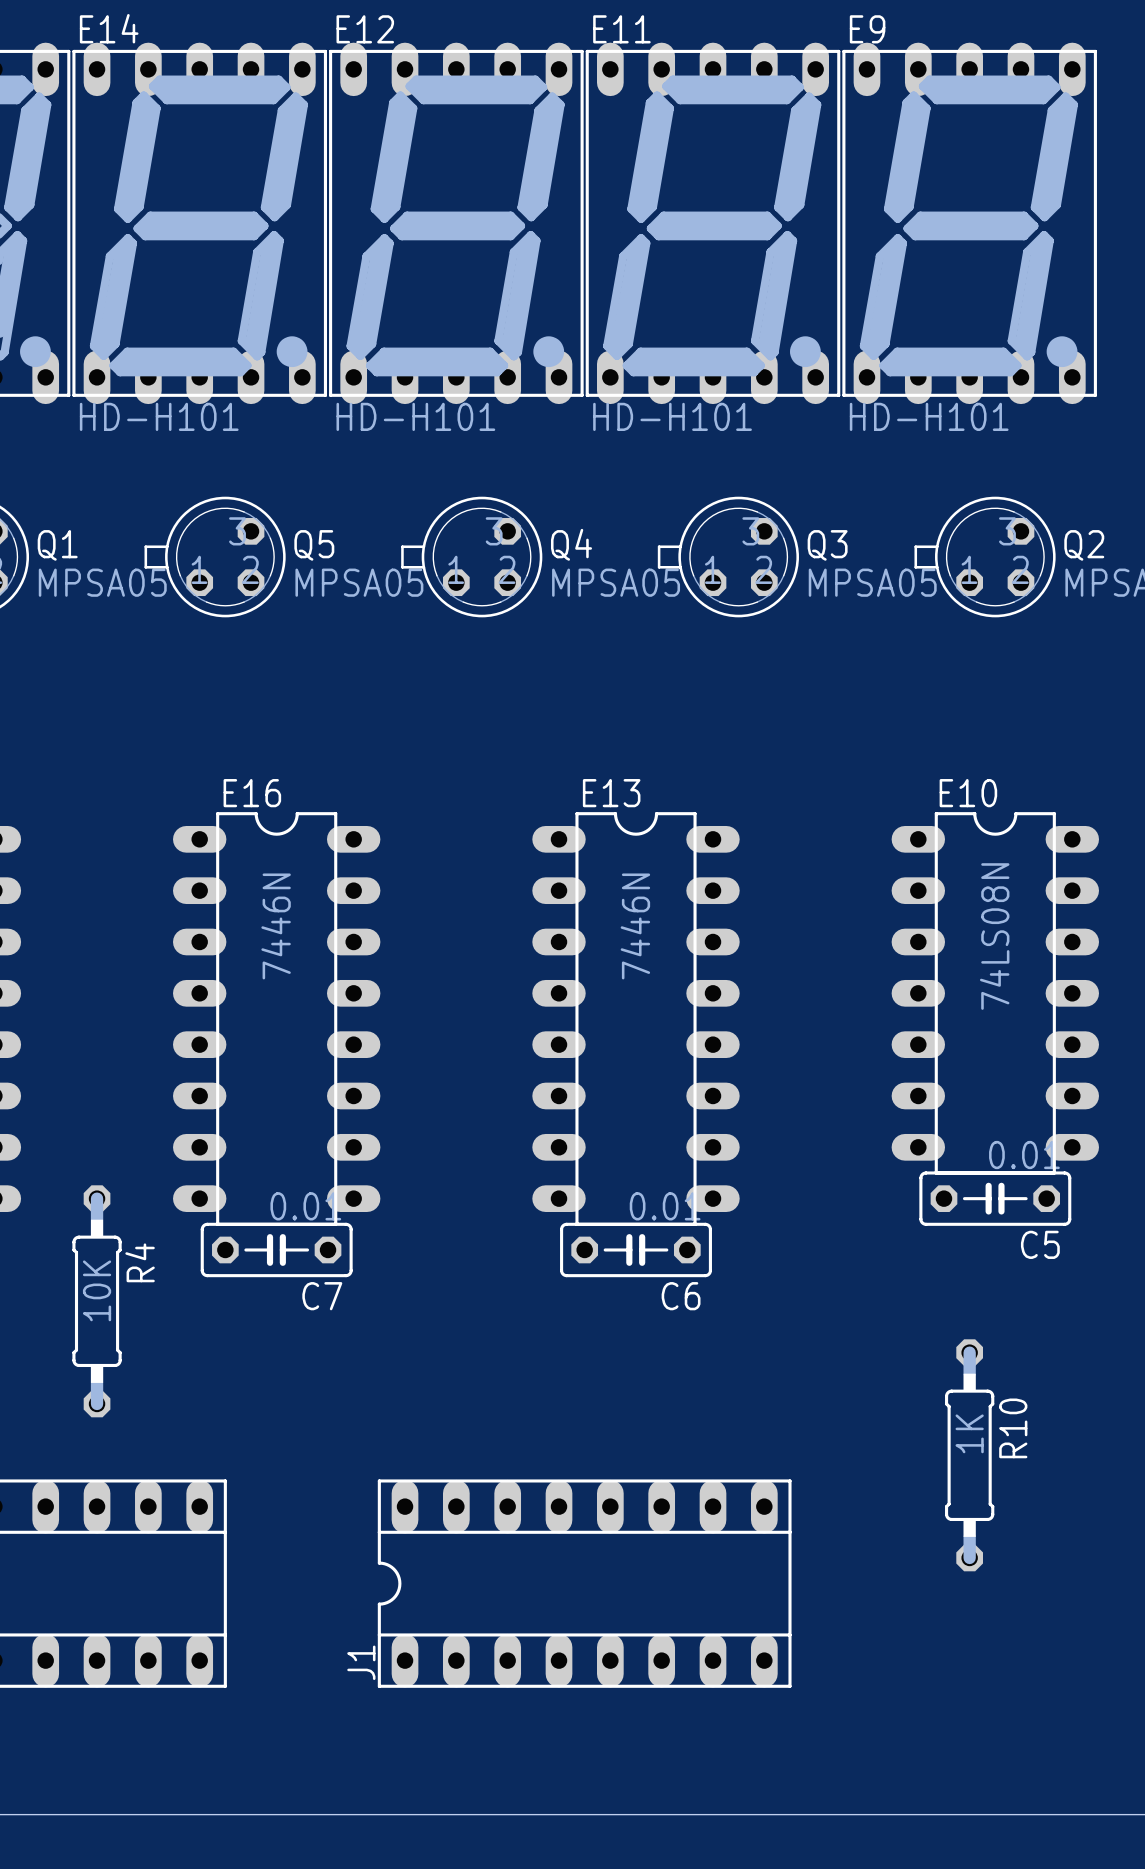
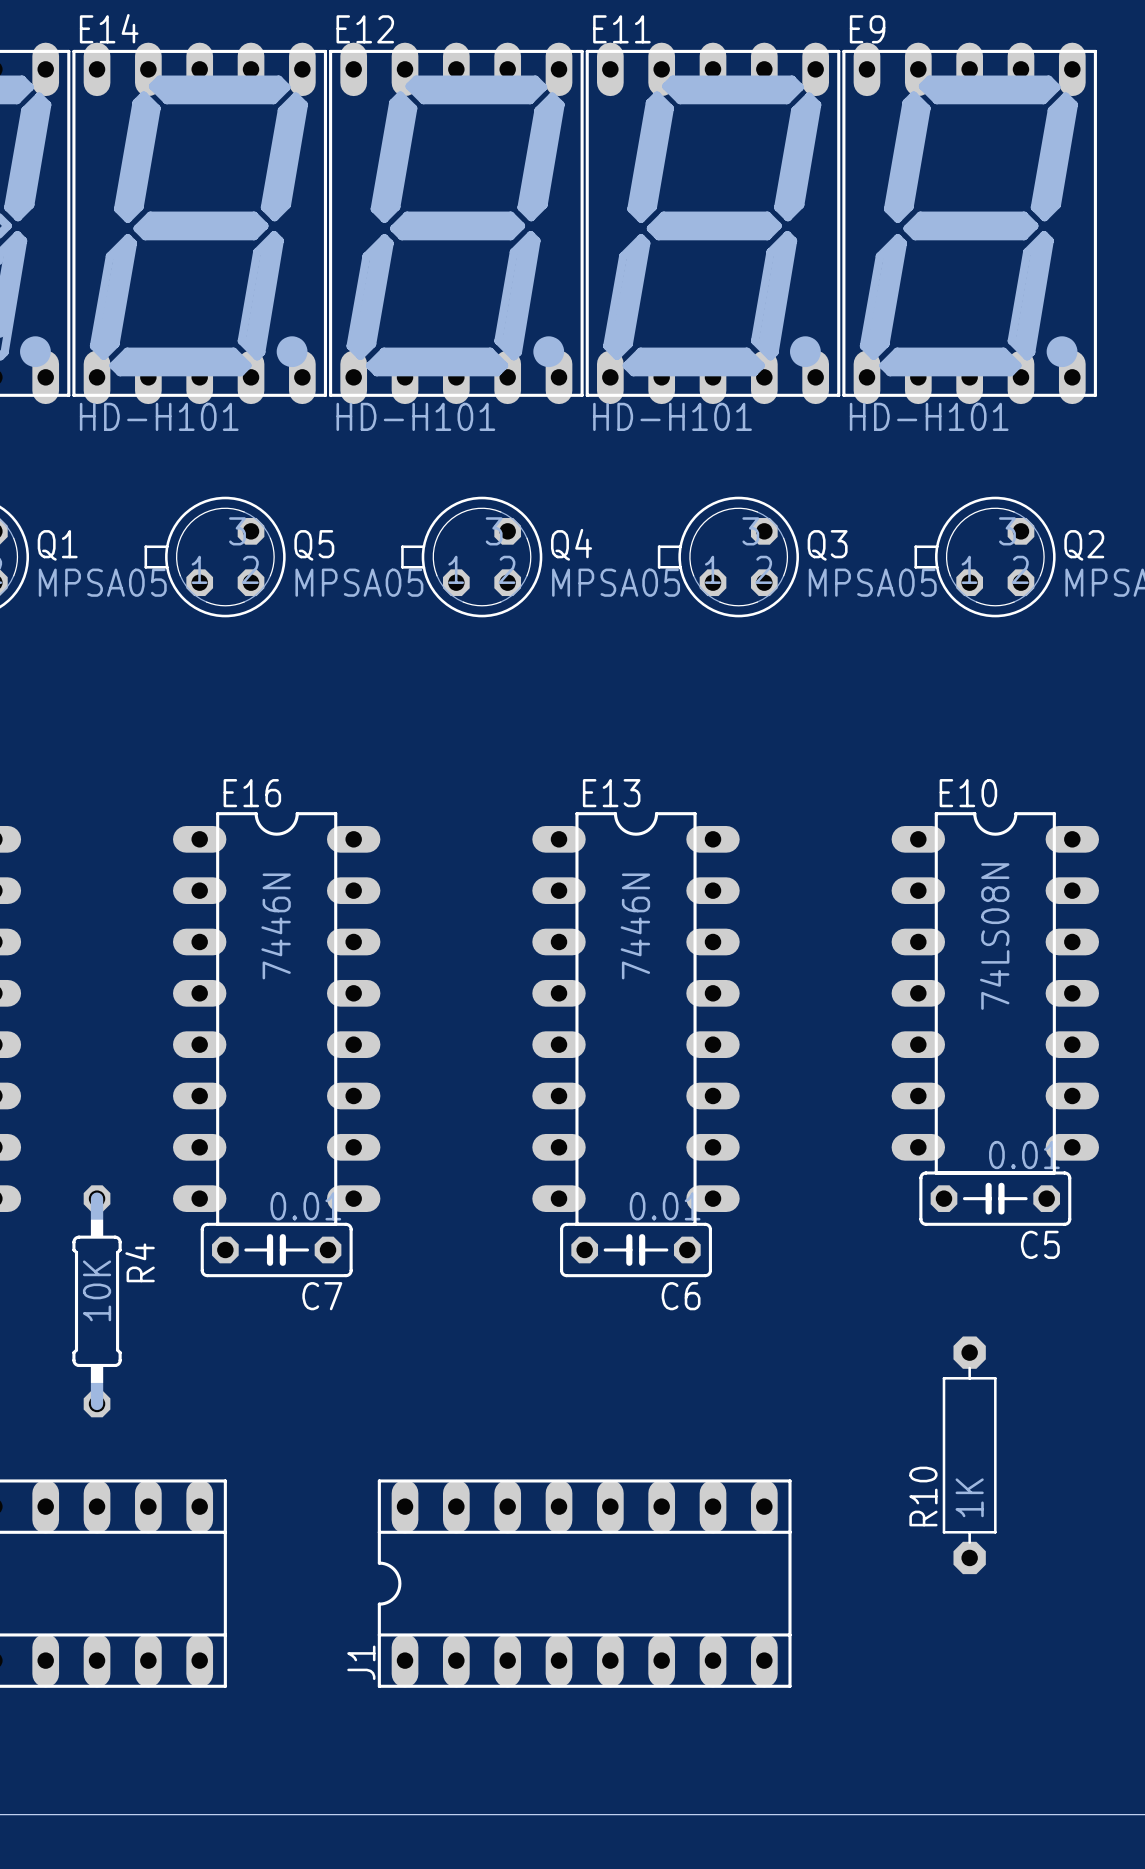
R10 footprint: [945, 1339, 995, 1572] -> [942, 1336, 997, 1575]
R10 name position: R10 (1013, 1428) -> R10 (923, 1496)
R10 value position: 1K (969, 1433) -> 1K (969, 1497)

